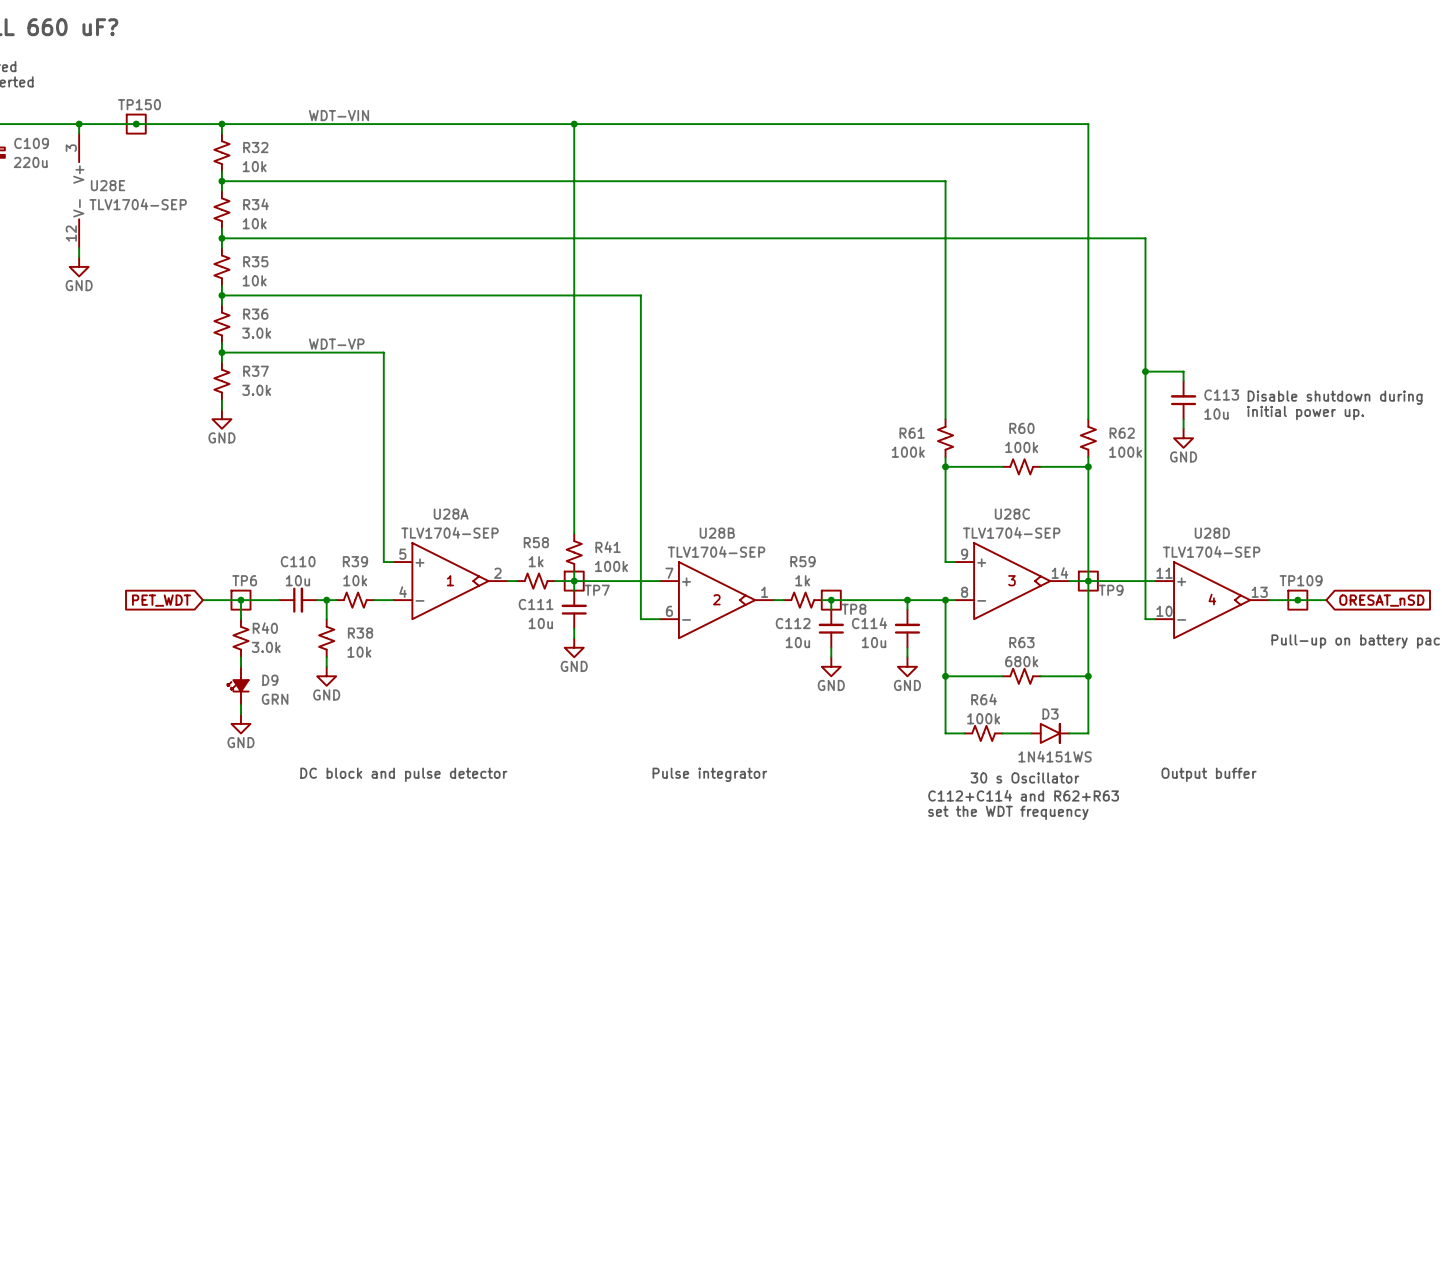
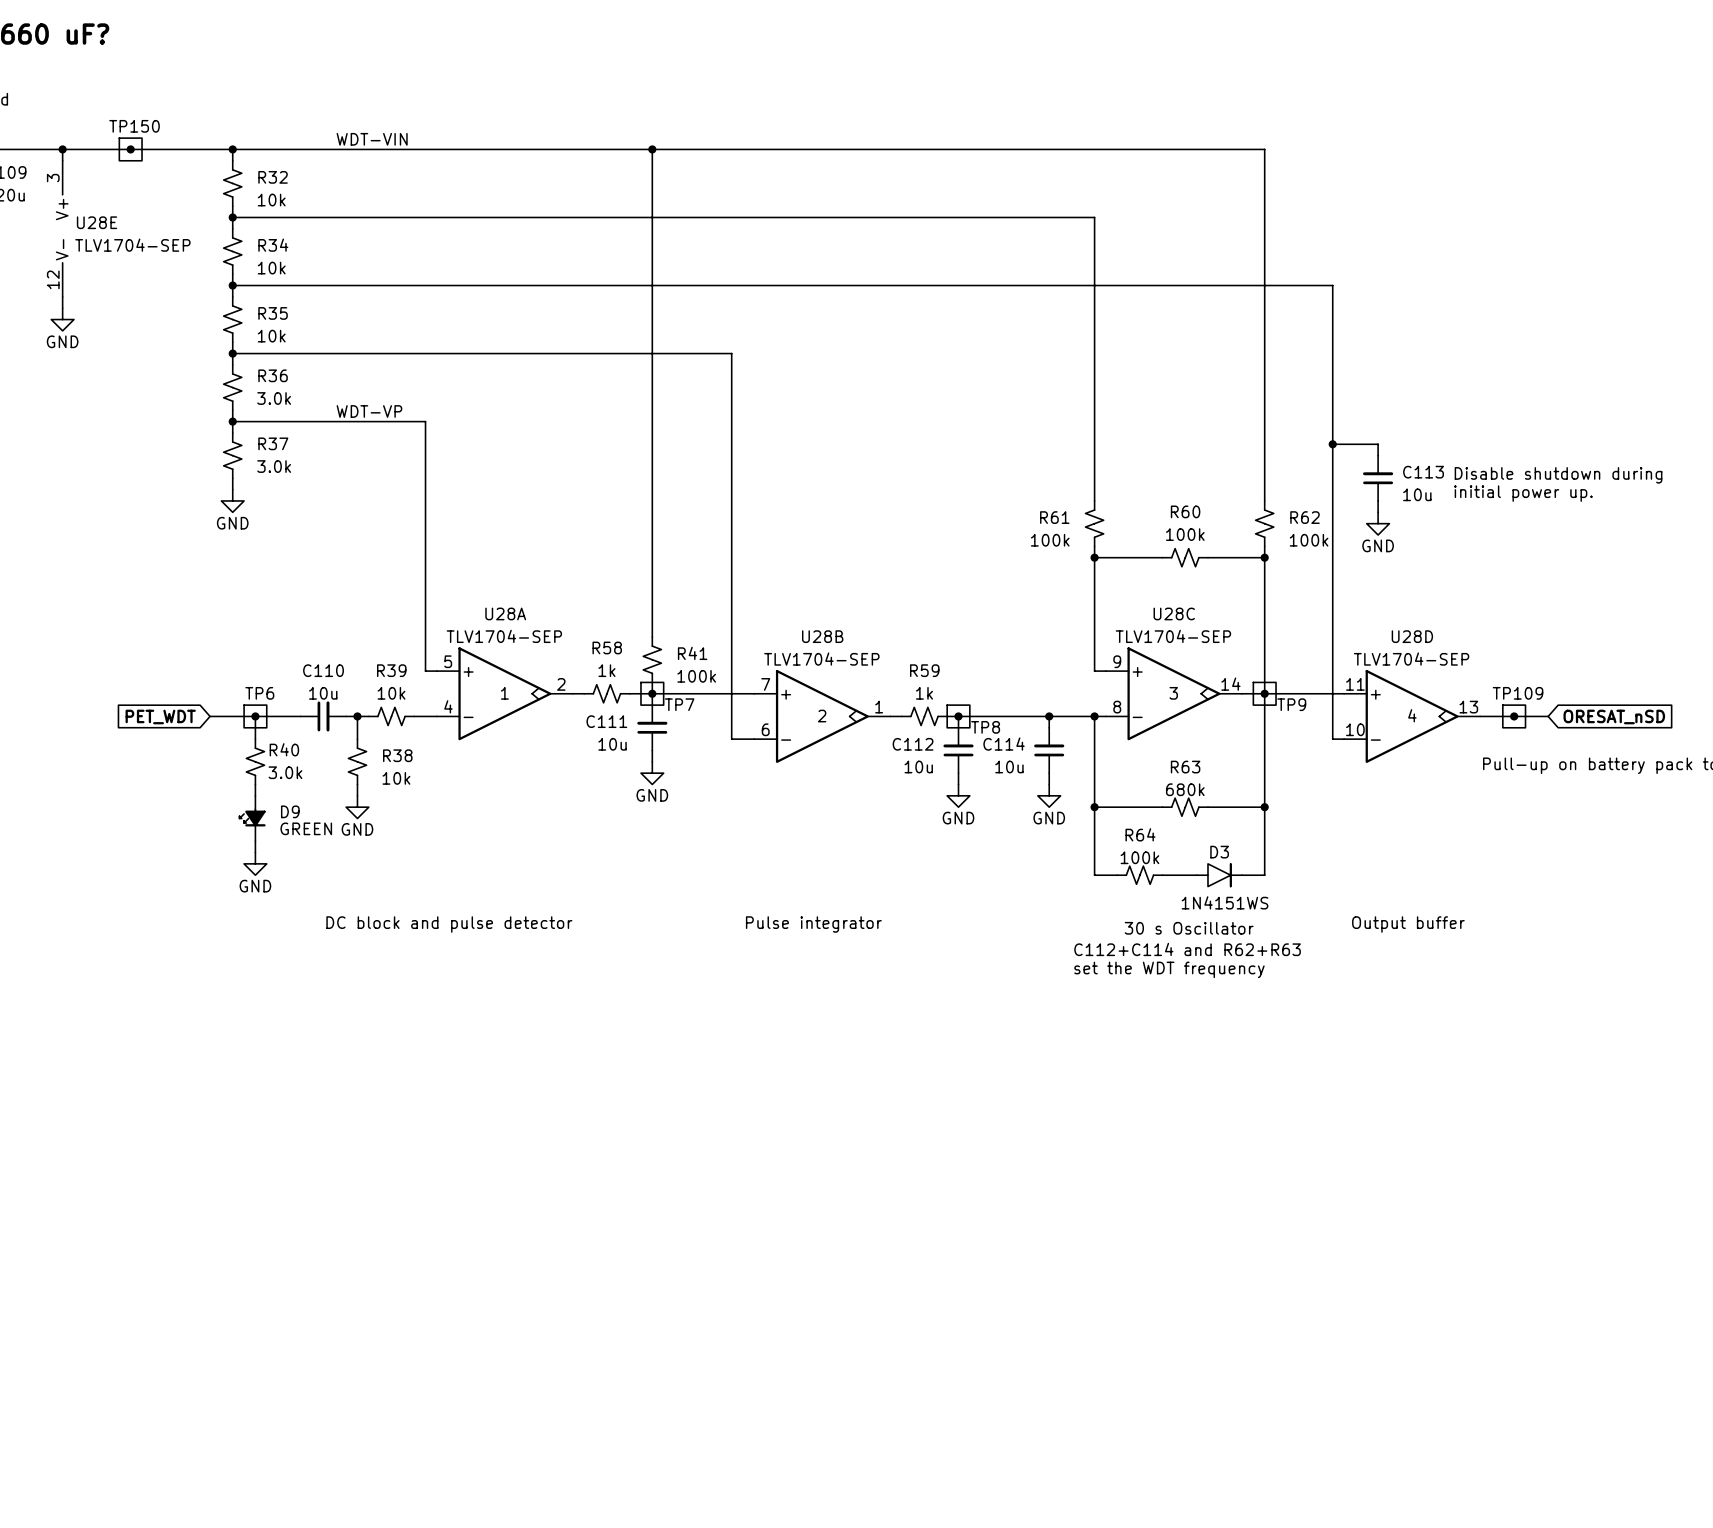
D9 value: GRN (275, 699) -> GREEN (306, 828)

